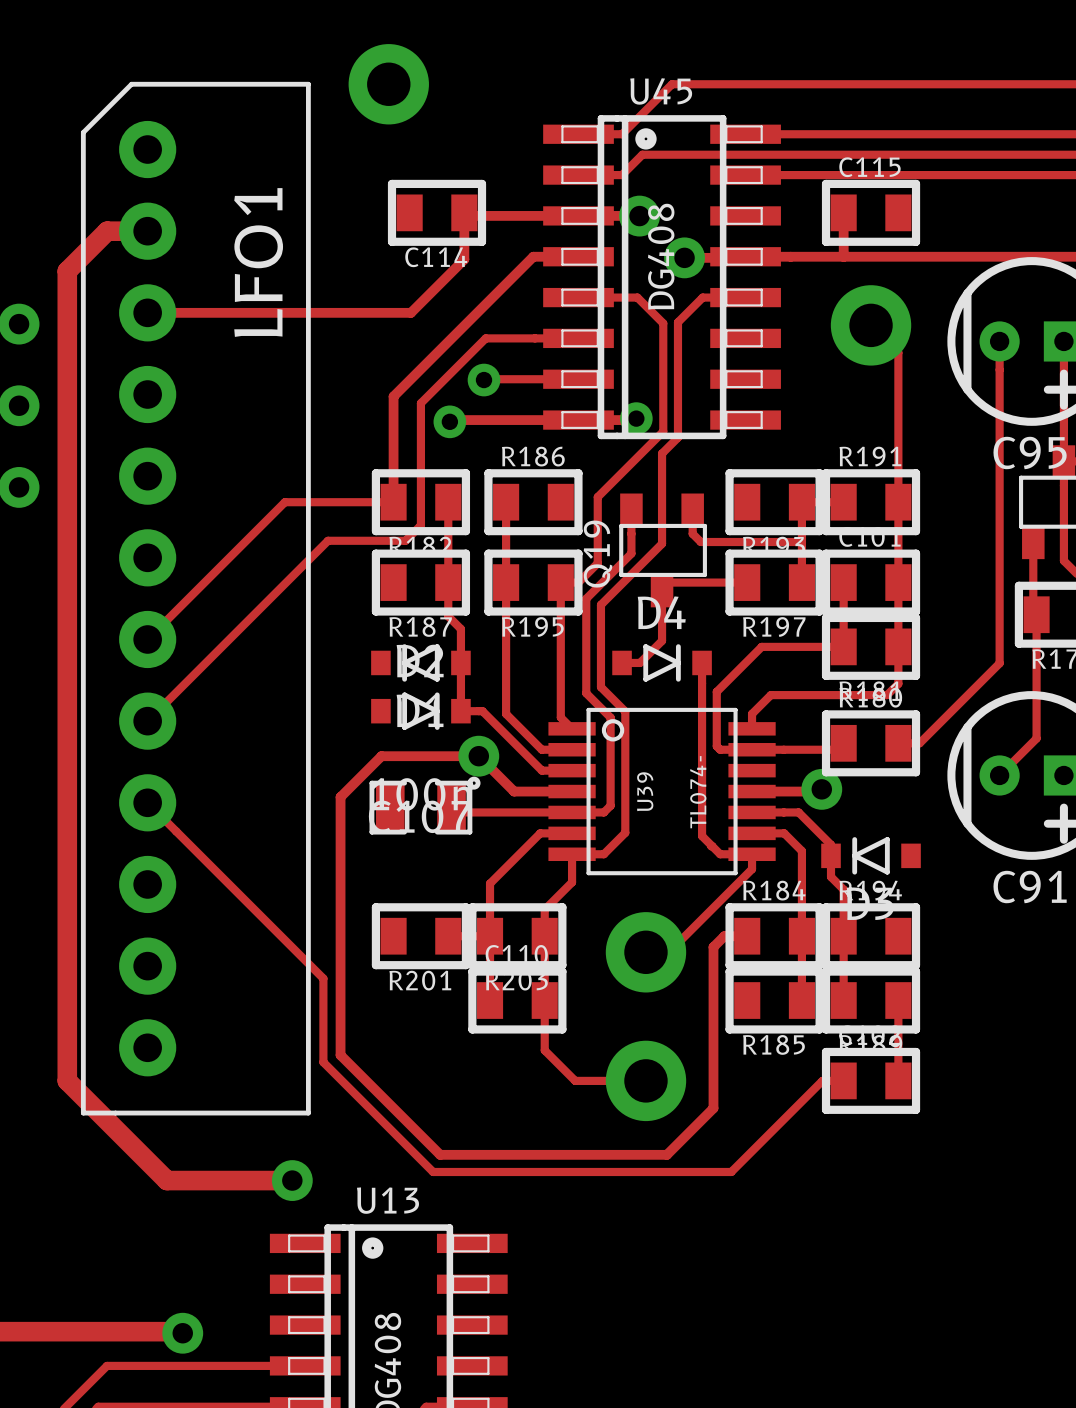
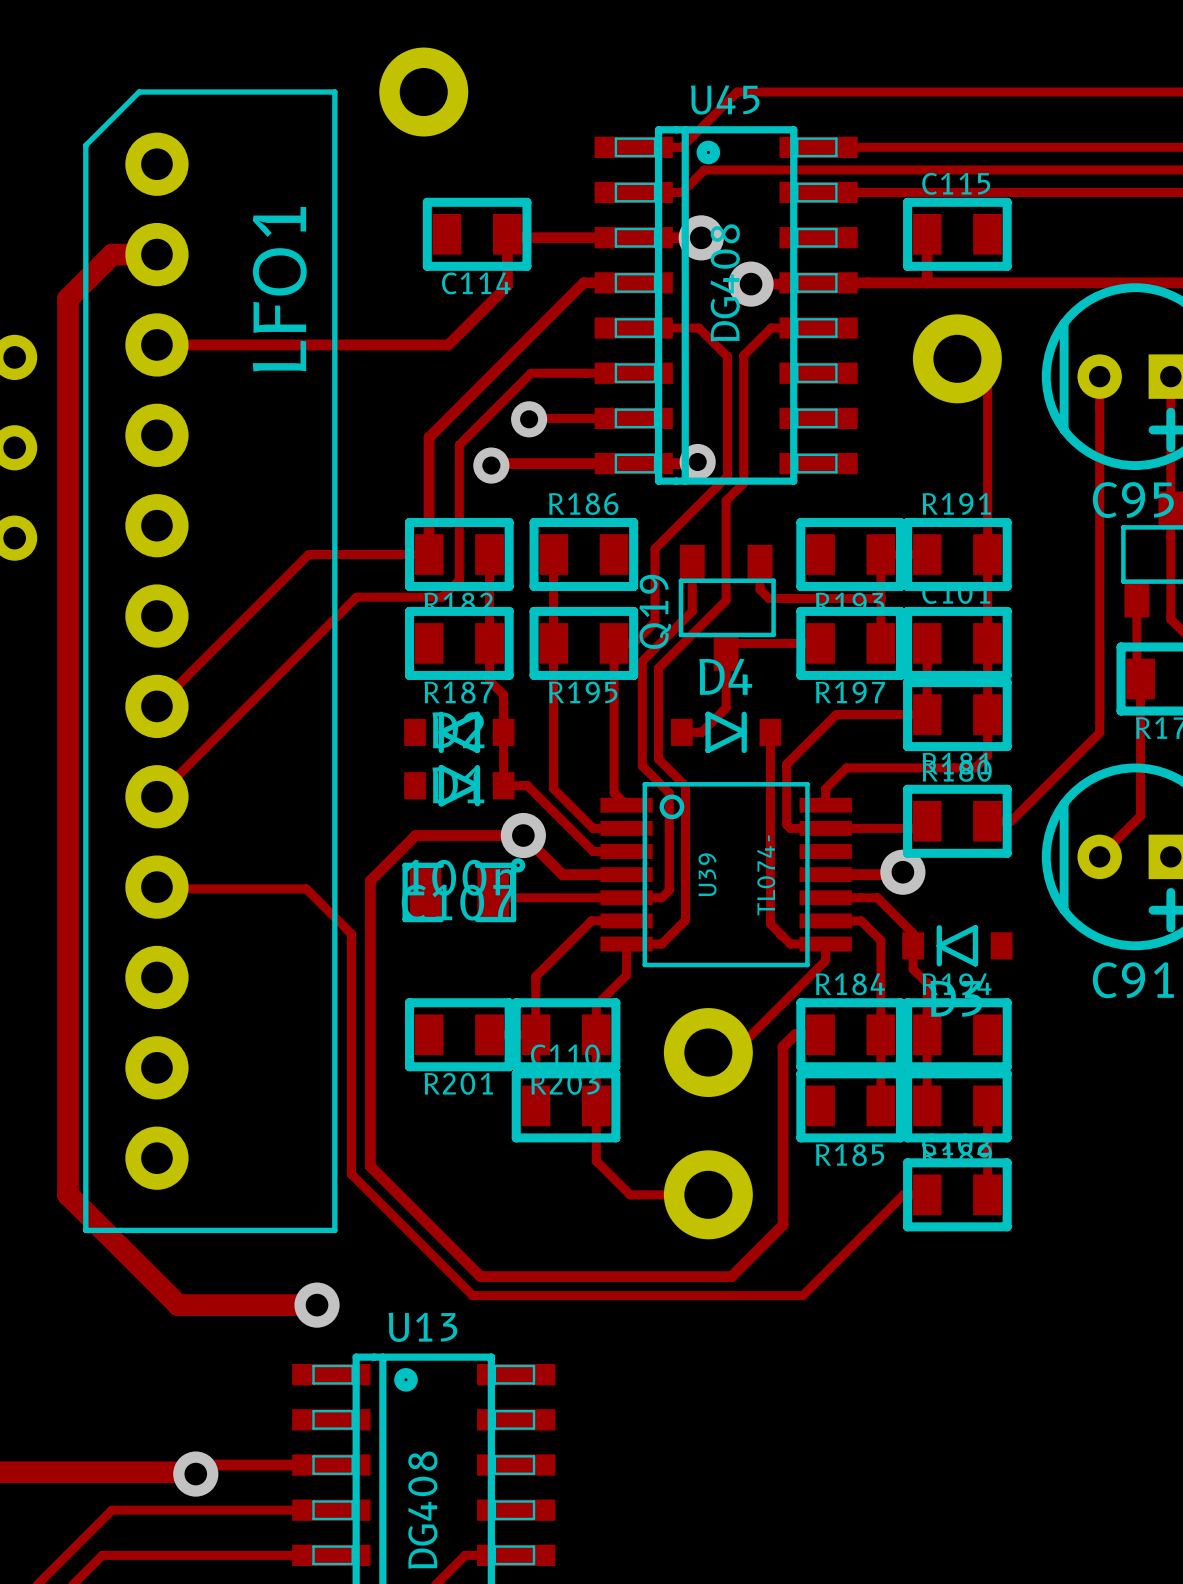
track: (149, 804) (323, 978) -> (158, 888) (306, 888) (351, 933) (351, 1081)
track: none -> (331, 1465) (204, 1465) (195, 1474)

